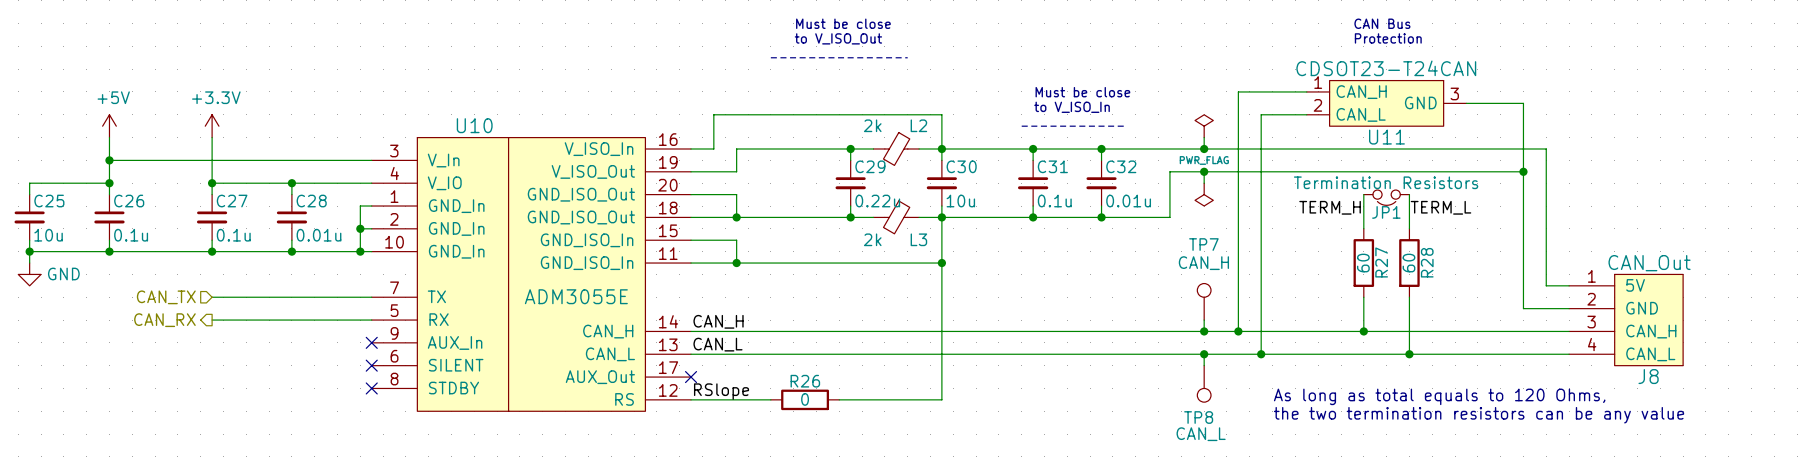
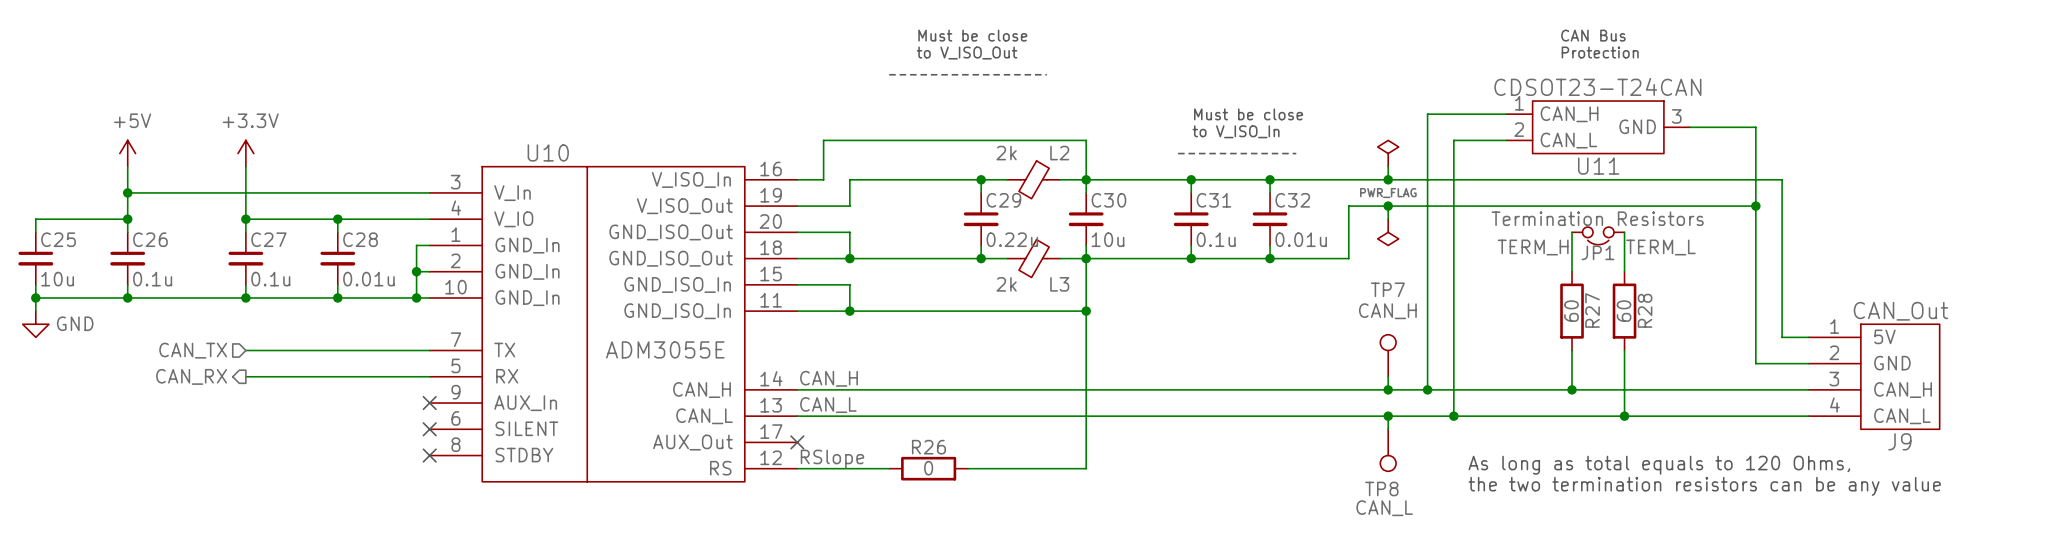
J8 name: J8 (1648, 376) -> J9 (1899, 441)

